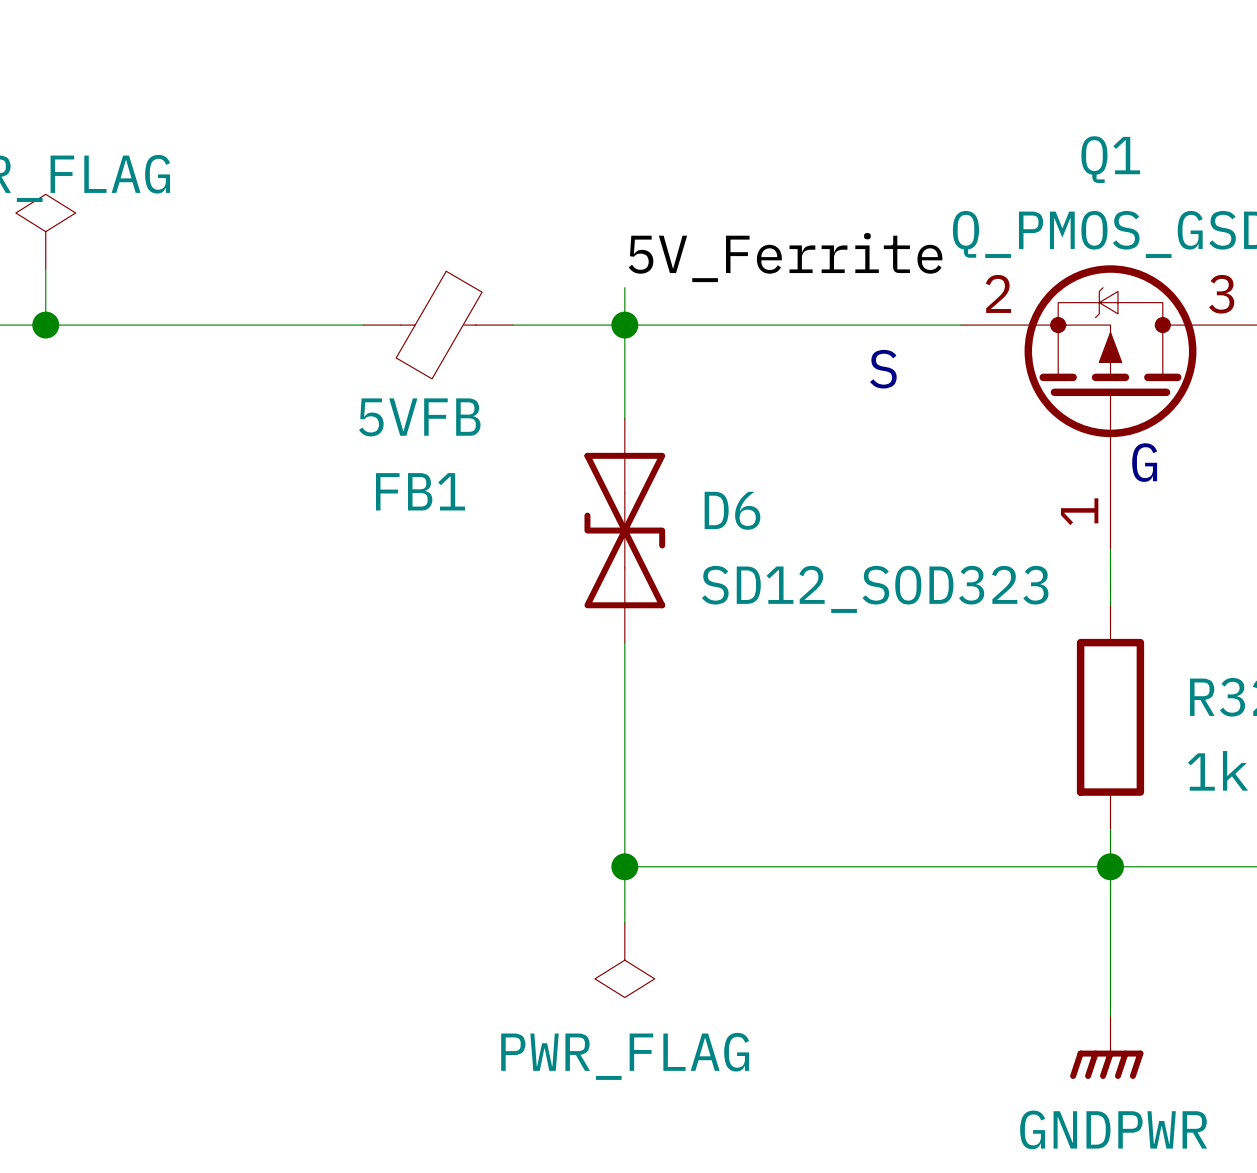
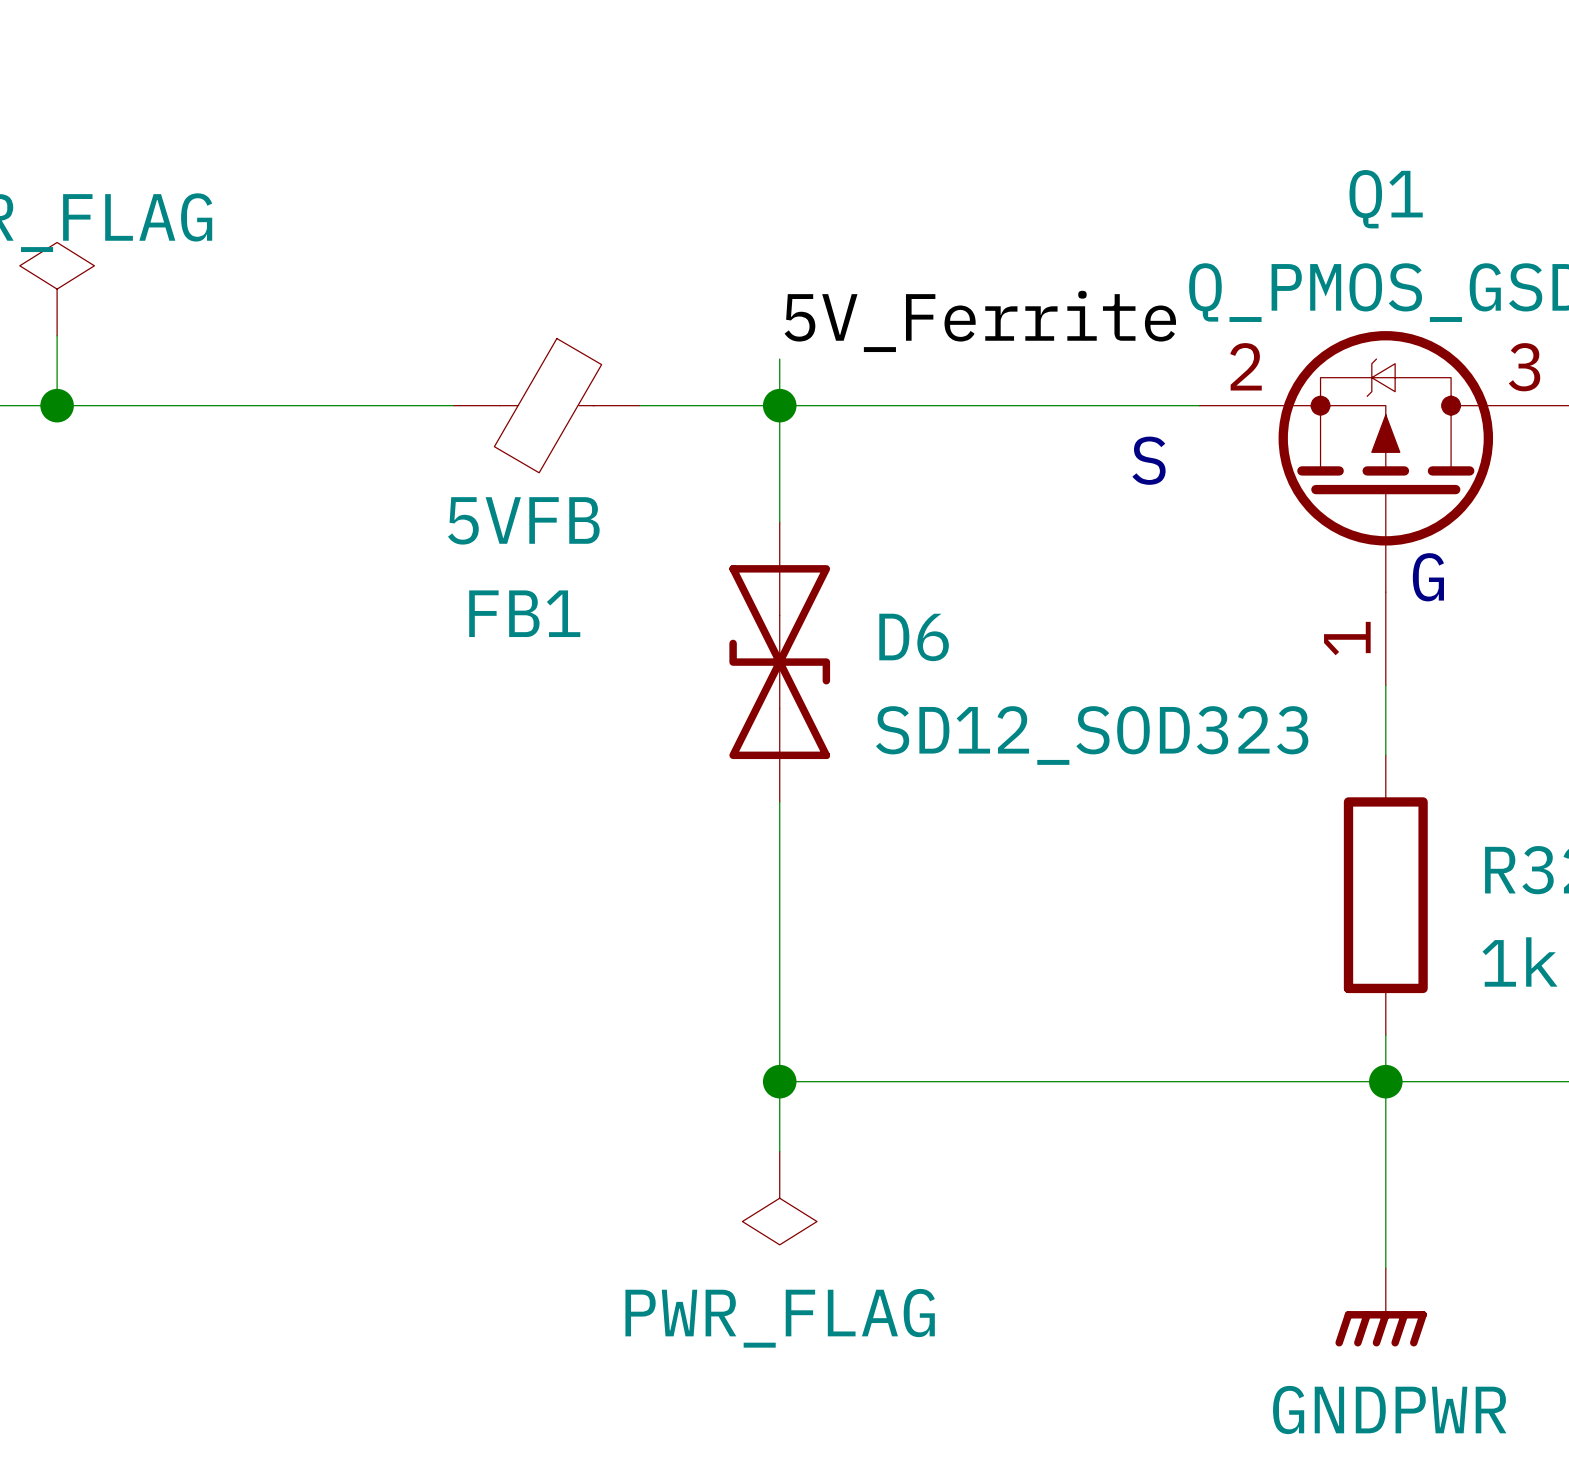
text position: S (883, 369) -> S (1148, 460)

